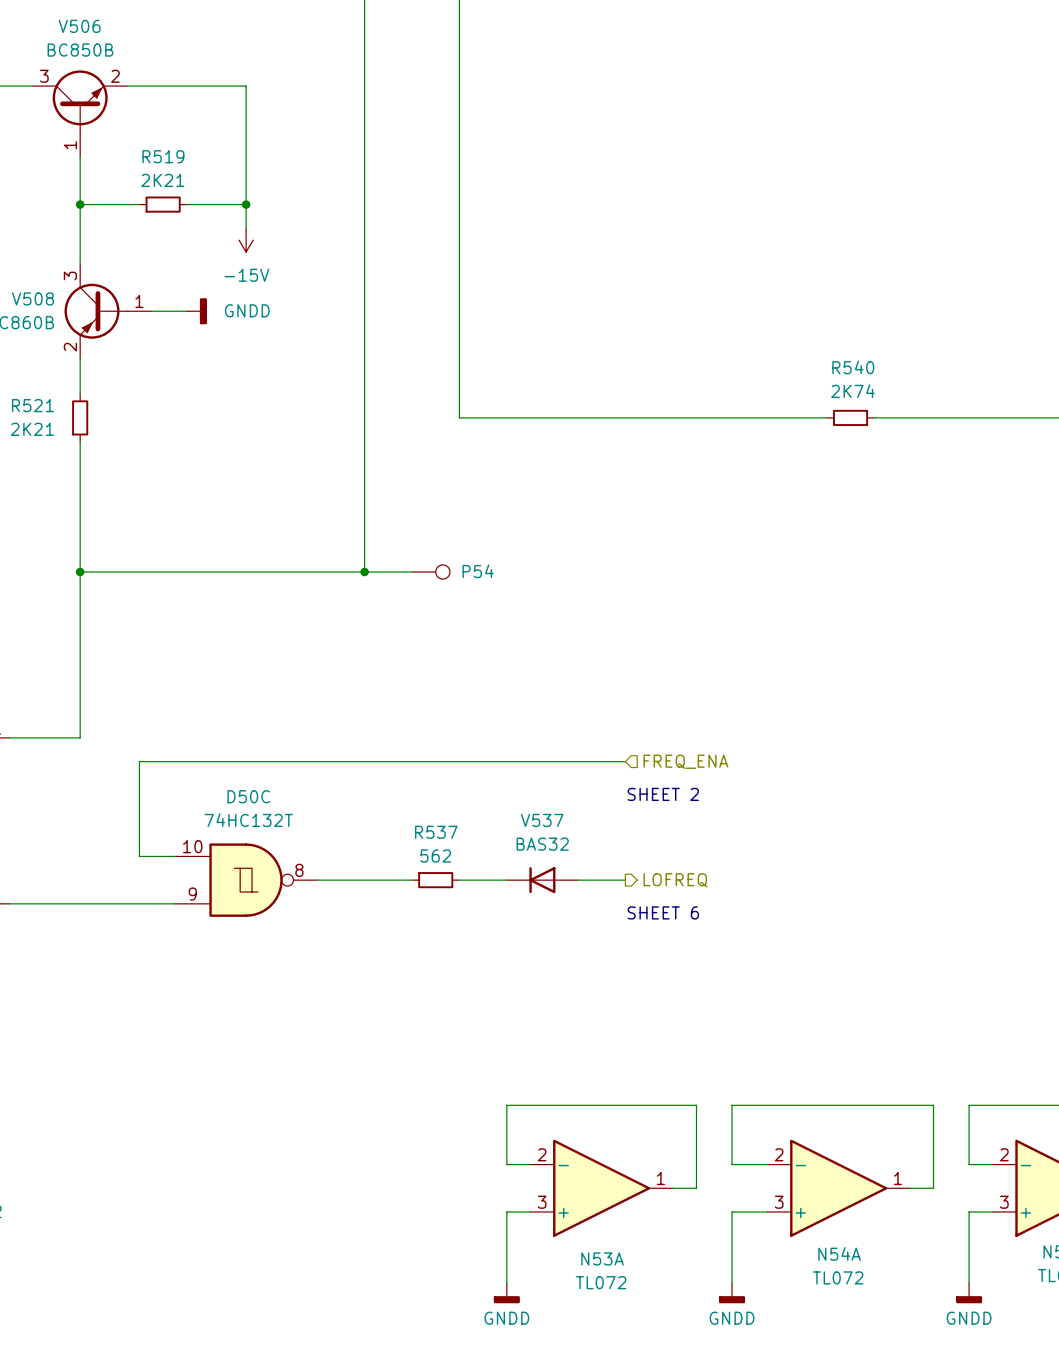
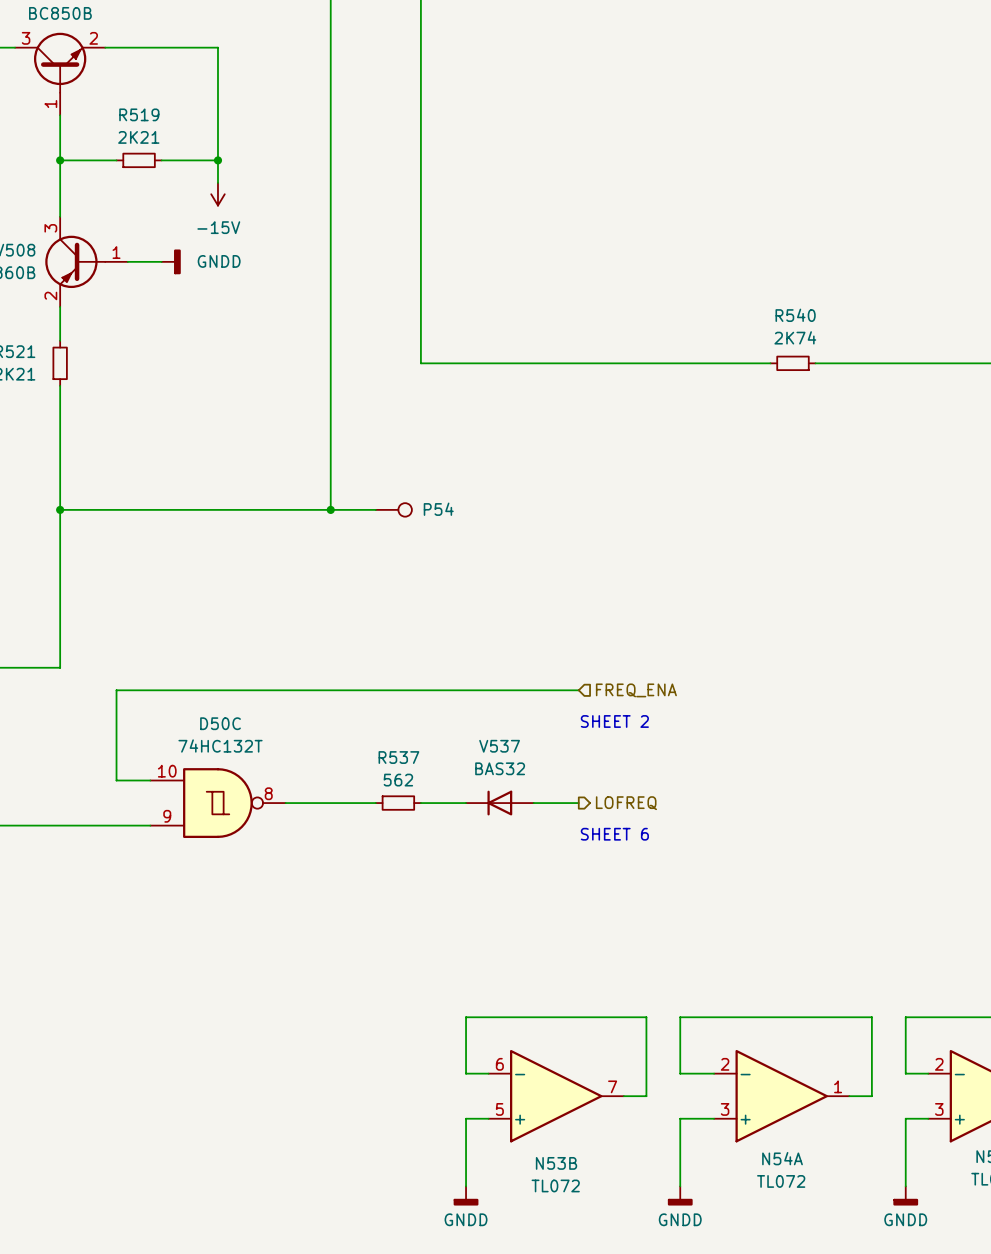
N53A pin number: 2 (542, 1154) -> 6 (499, 1064)
N53A pin number: 1 (660, 1178) -> 7 (612, 1086)
N53A pin number: 3 (542, 1202) -> 5 (499, 1109)
N53A name: N53A (602, 1258) -> N53B (556, 1163)

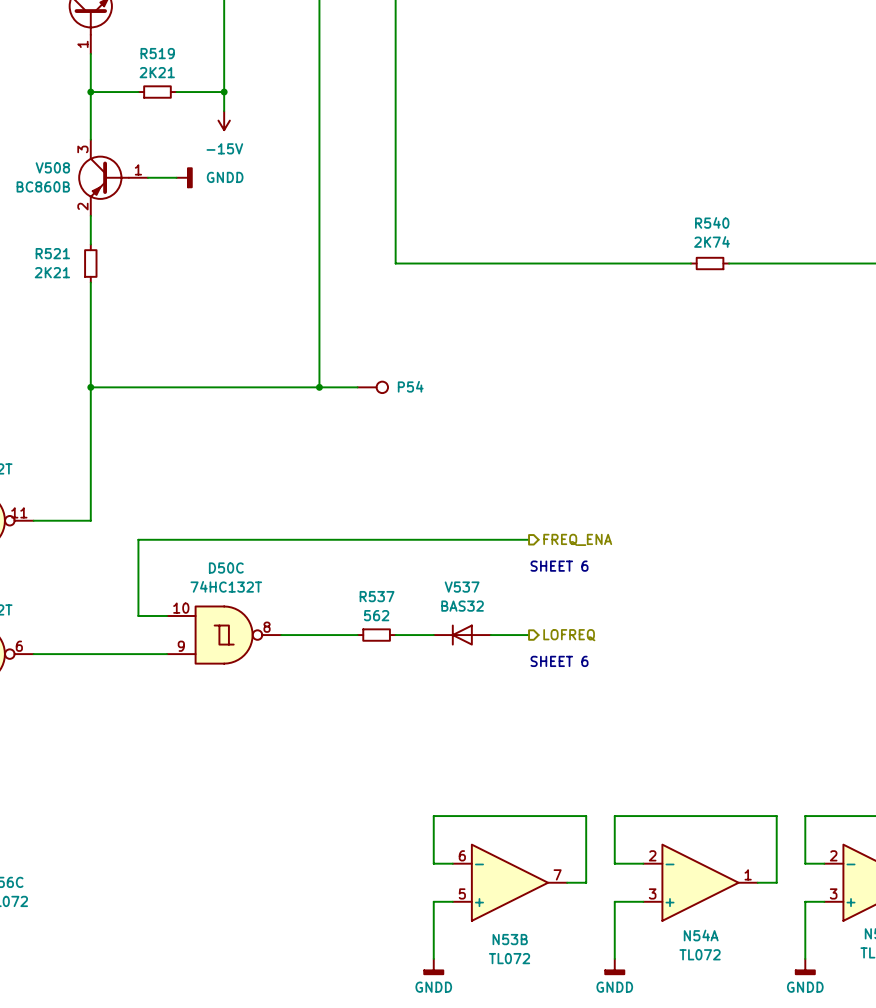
hierarchical label shape: input (636, 690) -> output (577, 539)
text: SHEET 2 (614, 721) -> SHEET 6 (559, 566)

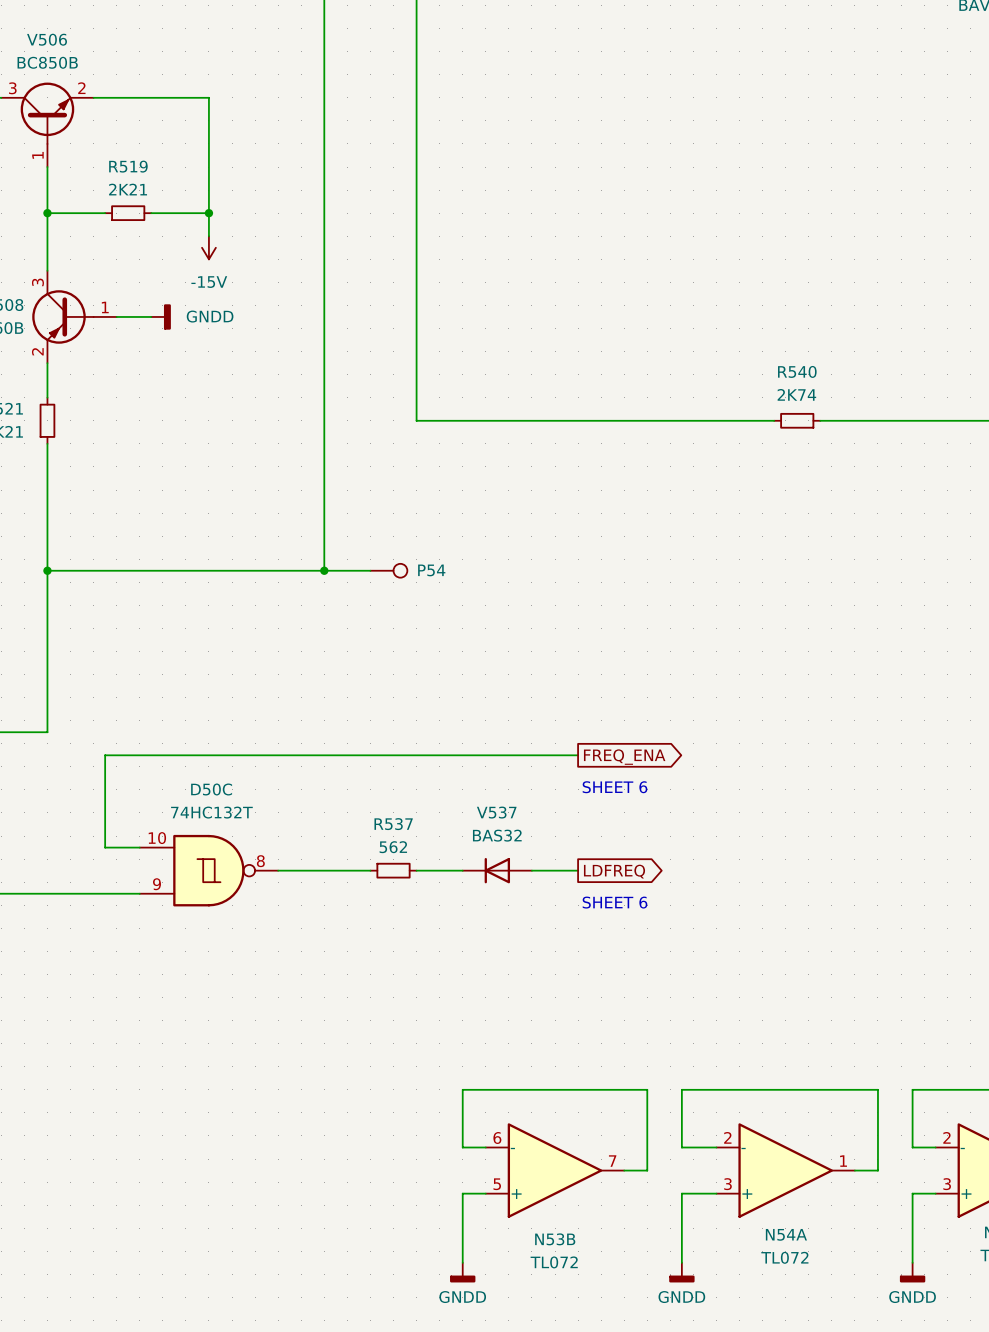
hierarchical label: FREQ_ENA (577, 539) -> none
global label: none -> FREQ_ENA (624, 757)
global label: none -> LDFREQ (614, 871)
hierarchical label: LOFREQ (569, 635) -> none

